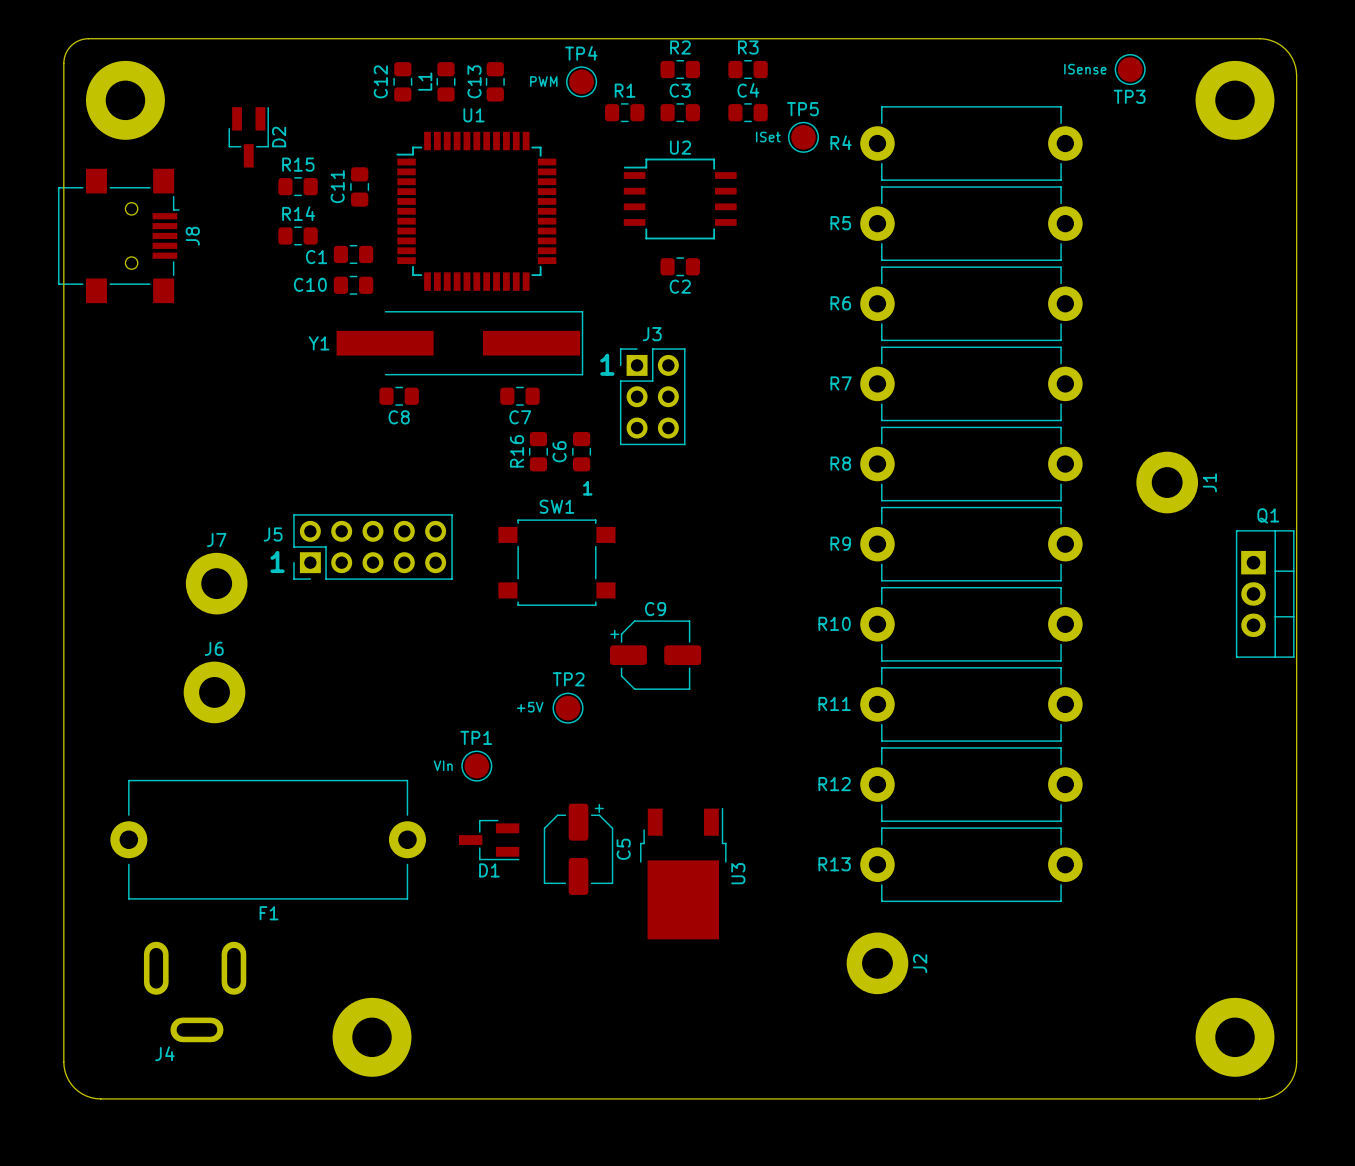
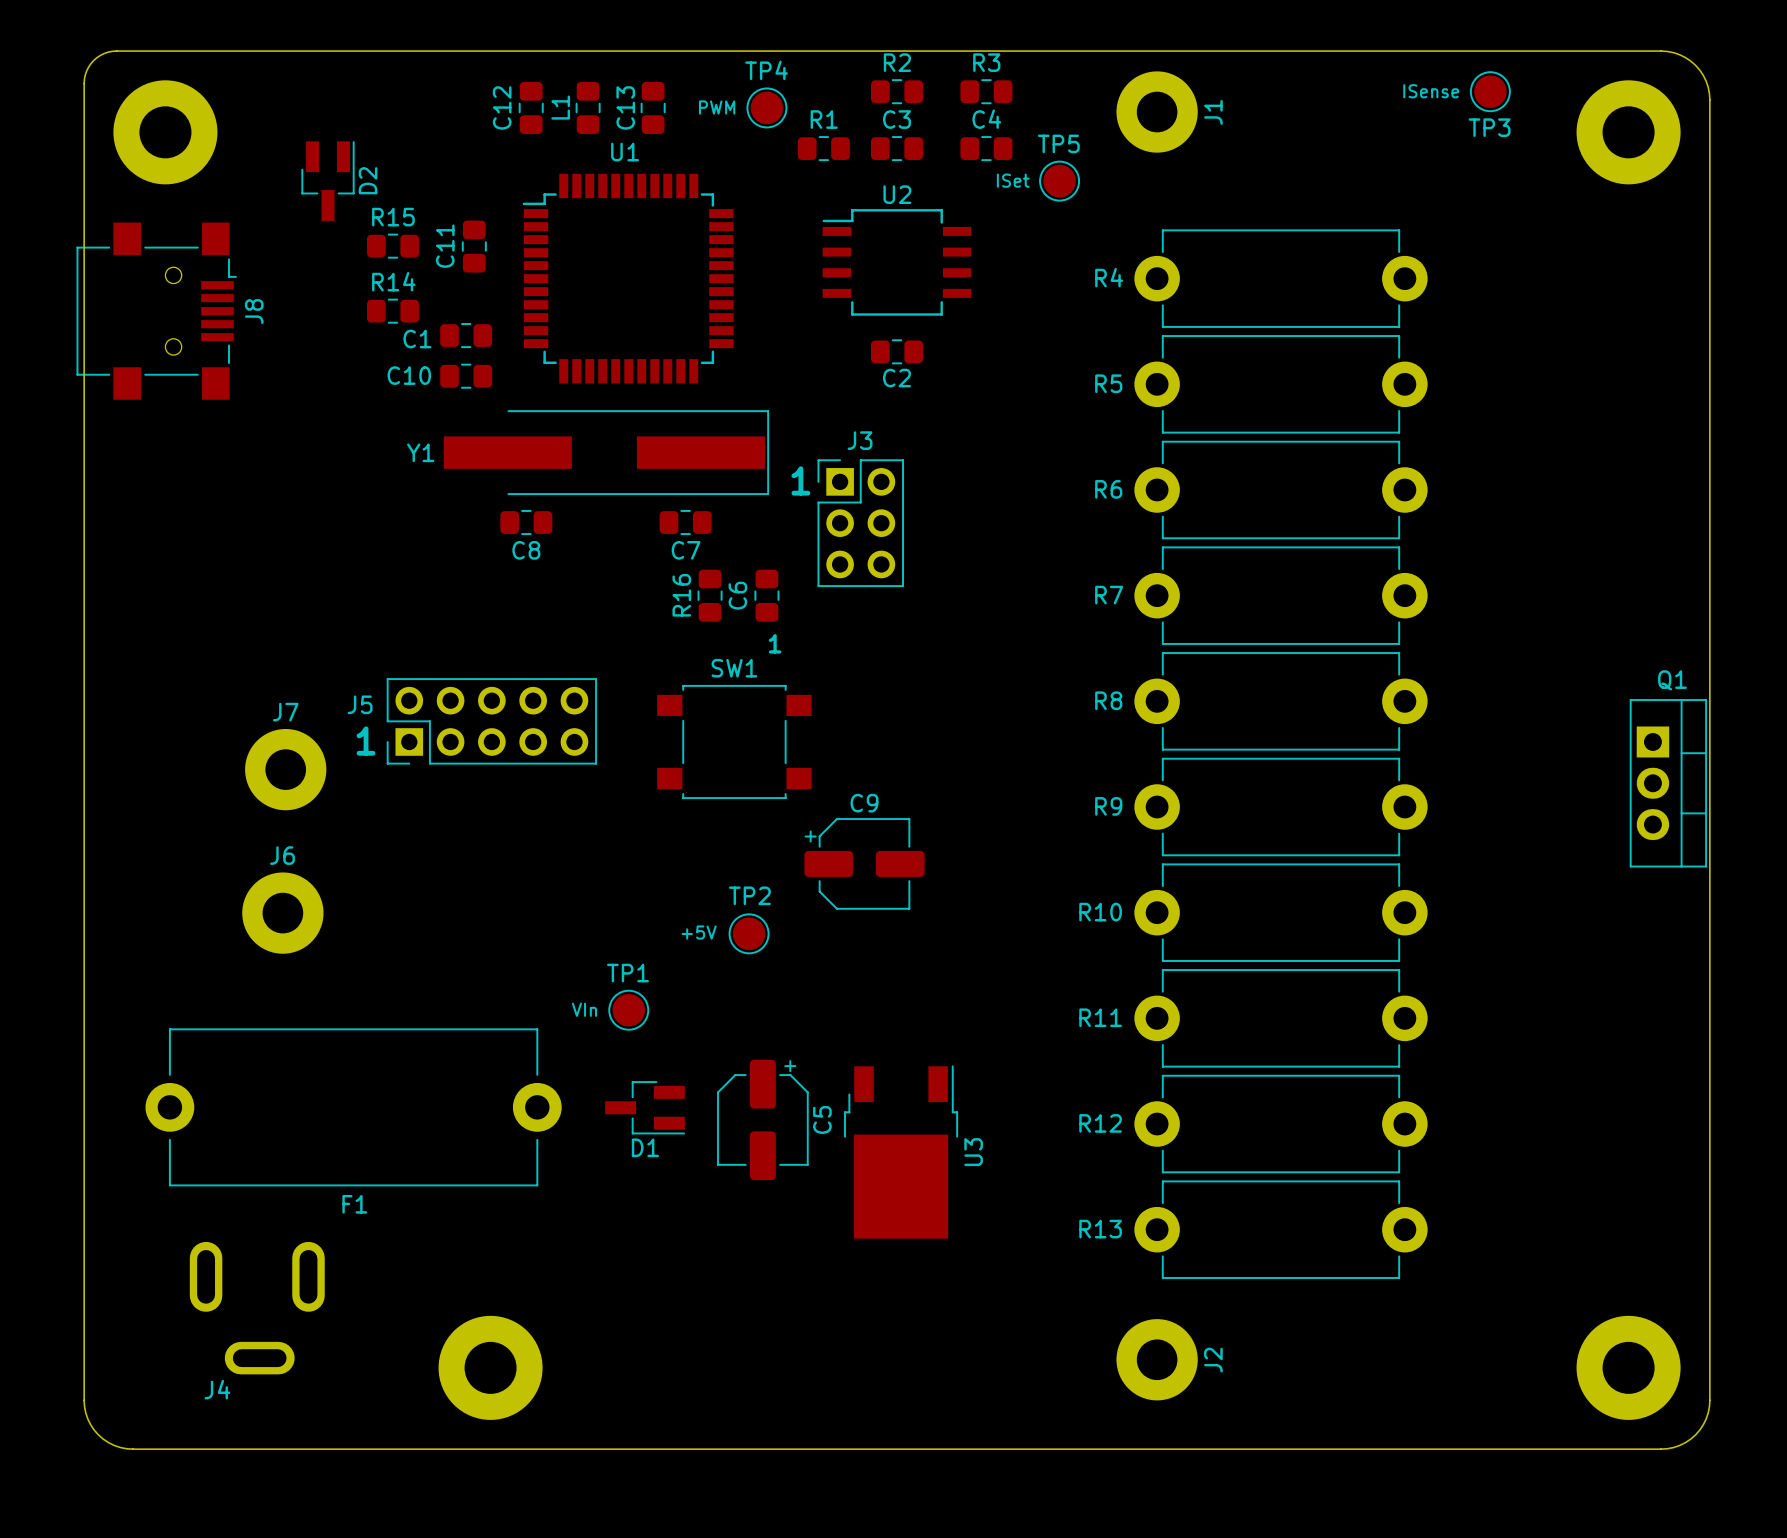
R4 position: (971, 143) -> (1280, 278)
R5 position: (971, 223) -> (1280, 384)
R6 position: (971, 303) -> (1280, 489)
R7 position: (971, 383) -> (1280, 595)
R8 position: (971, 464) -> (1280, 701)
J1 position: (1167, 482) -> (1157, 112)
R9 position: (971, 544) -> (1280, 807)
R10 position: (971, 624) -> (1280, 912)
R11 position: (971, 704) -> (1280, 1018)
R12 position: (971, 784) -> (1280, 1124)
R13 position: (971, 864) -> (1280, 1229)
J2 position: (877, 963) -> (1157, 1359)

